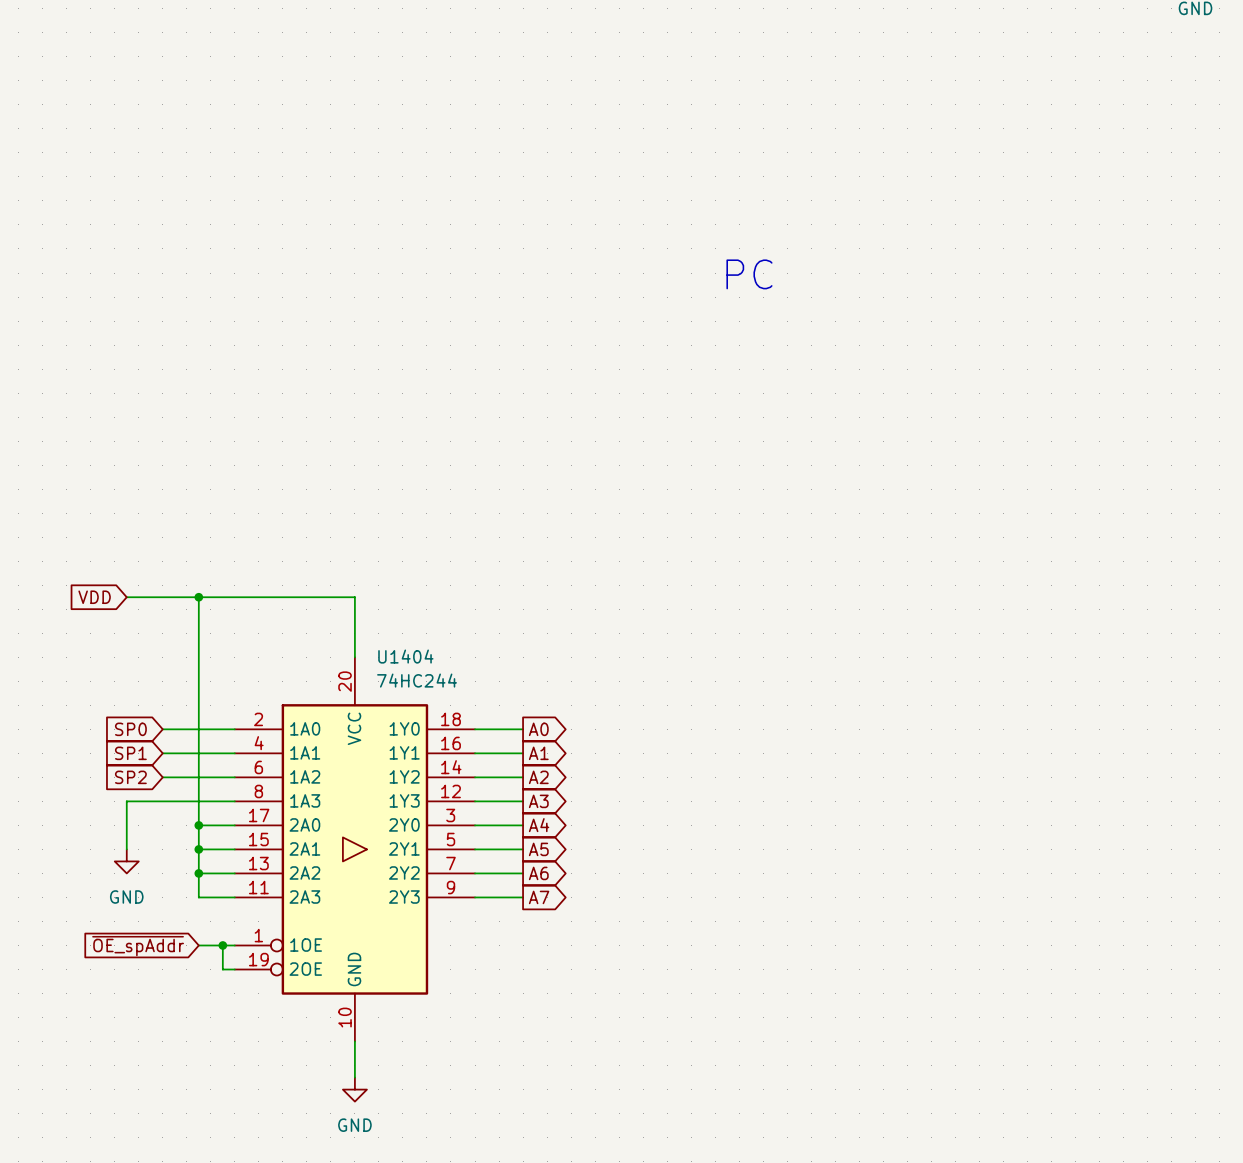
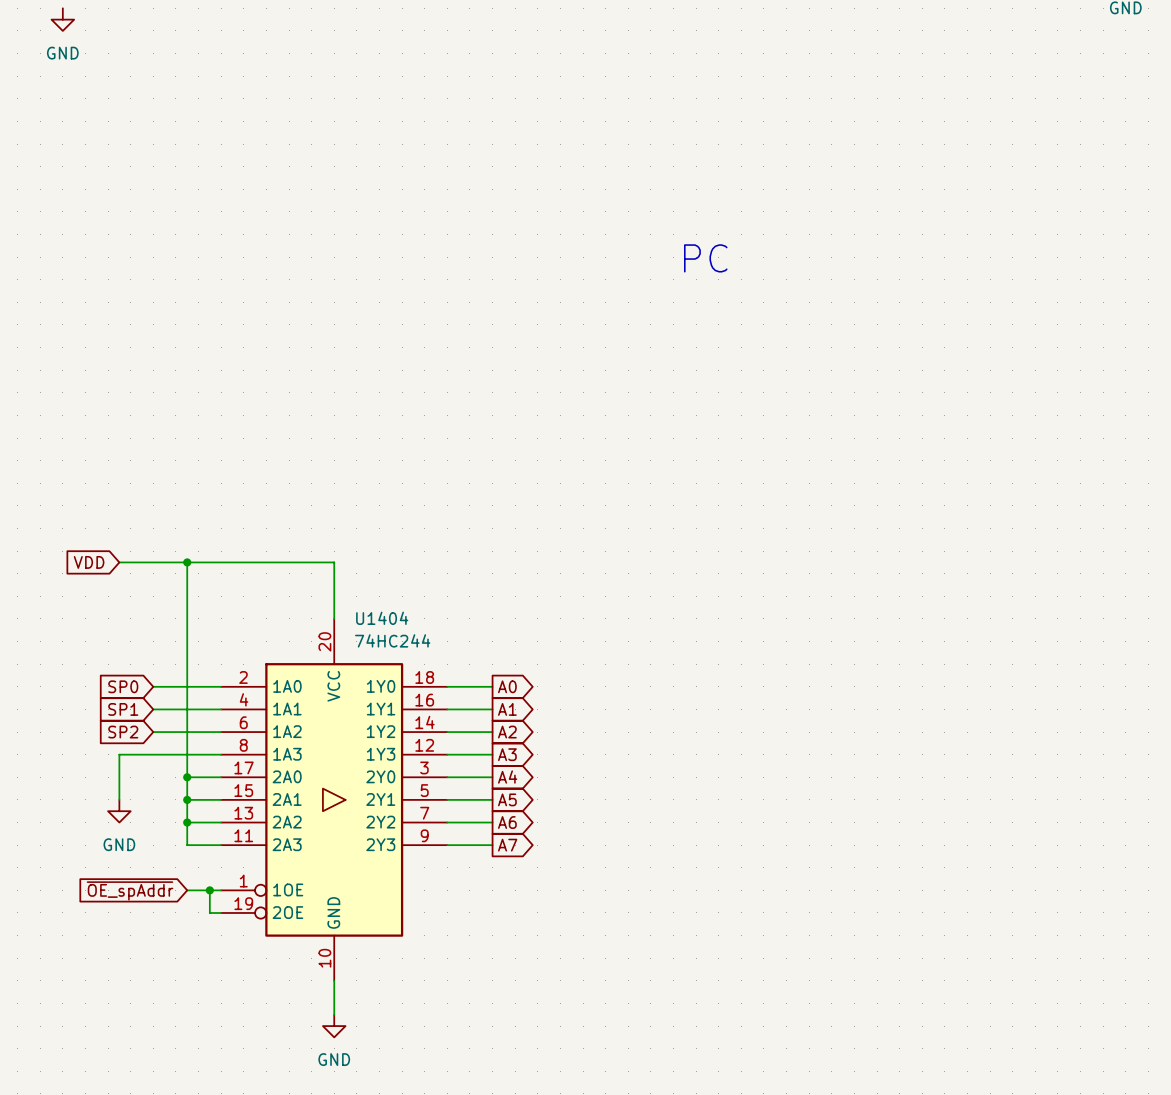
power symbol: none -> GND (62, 19)

